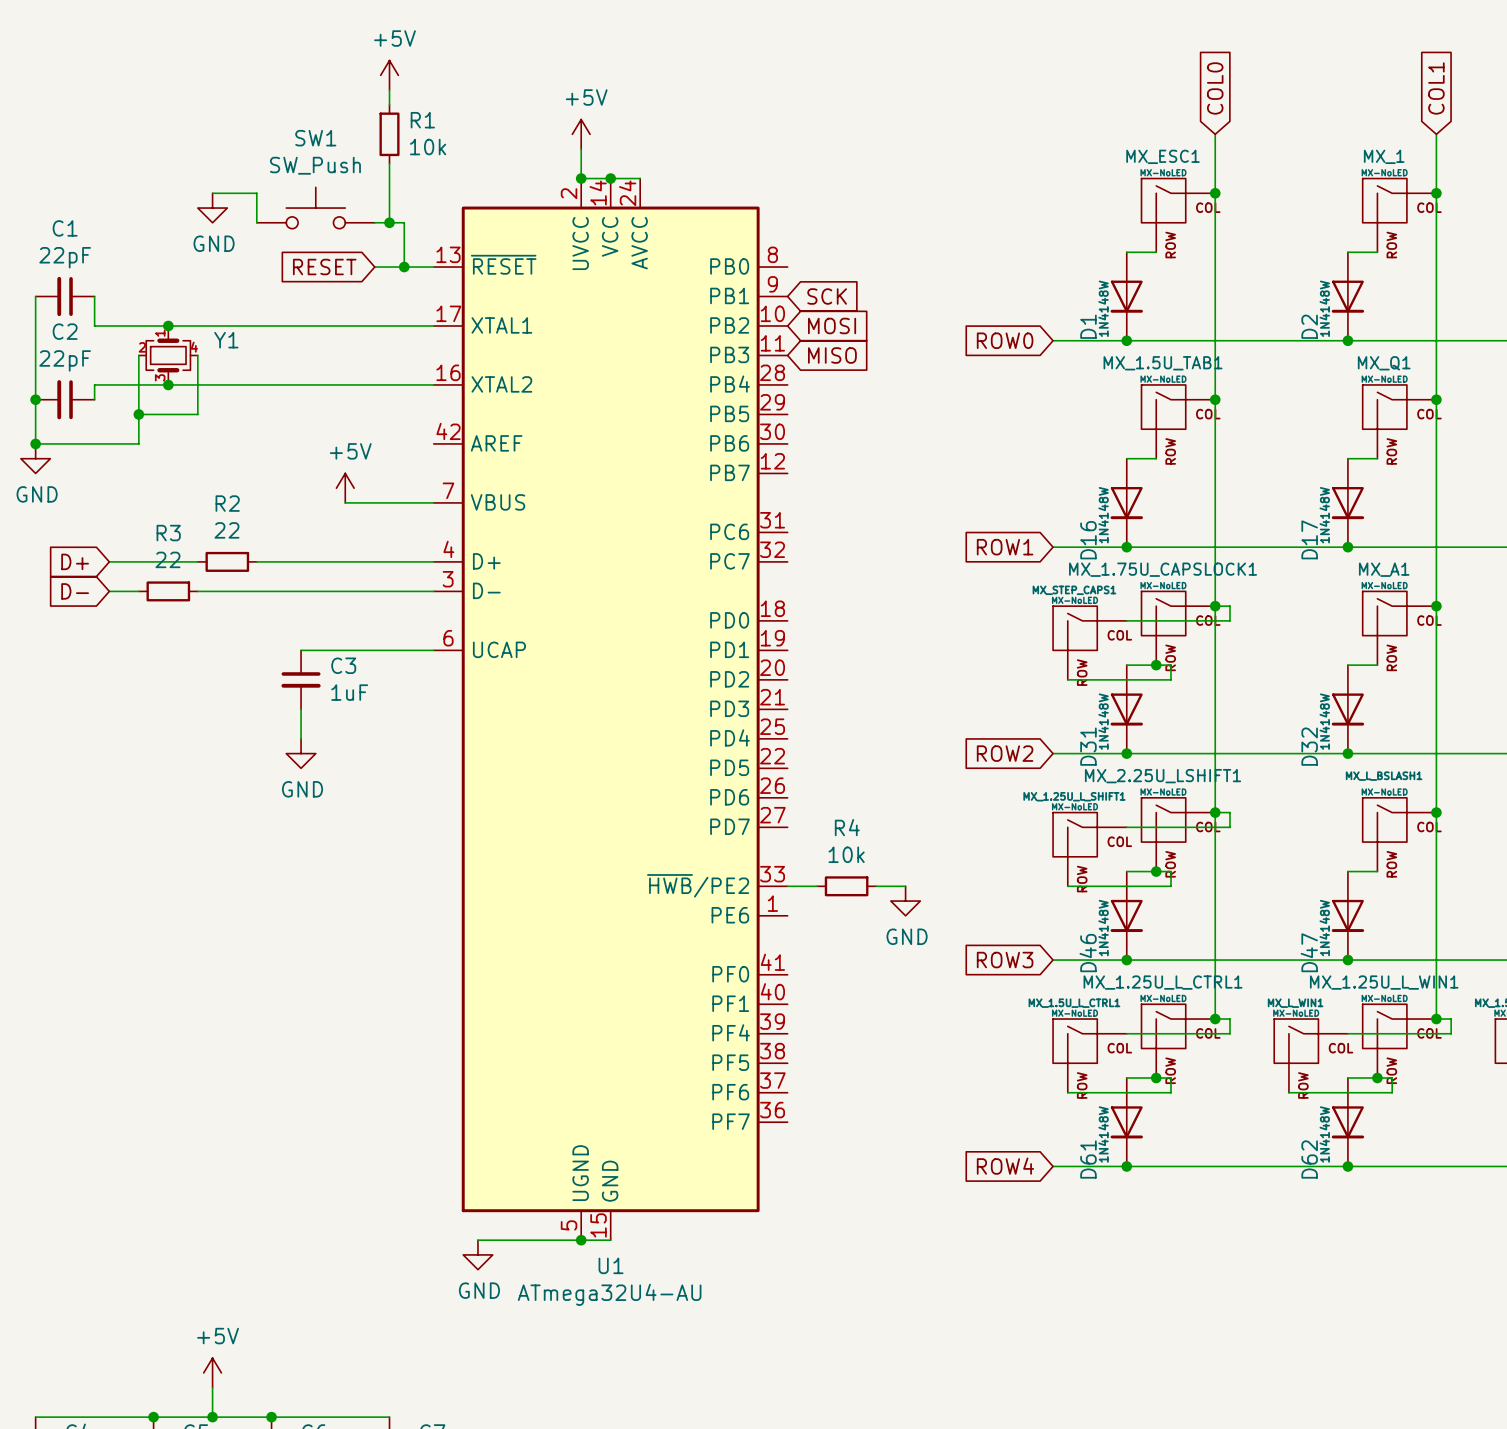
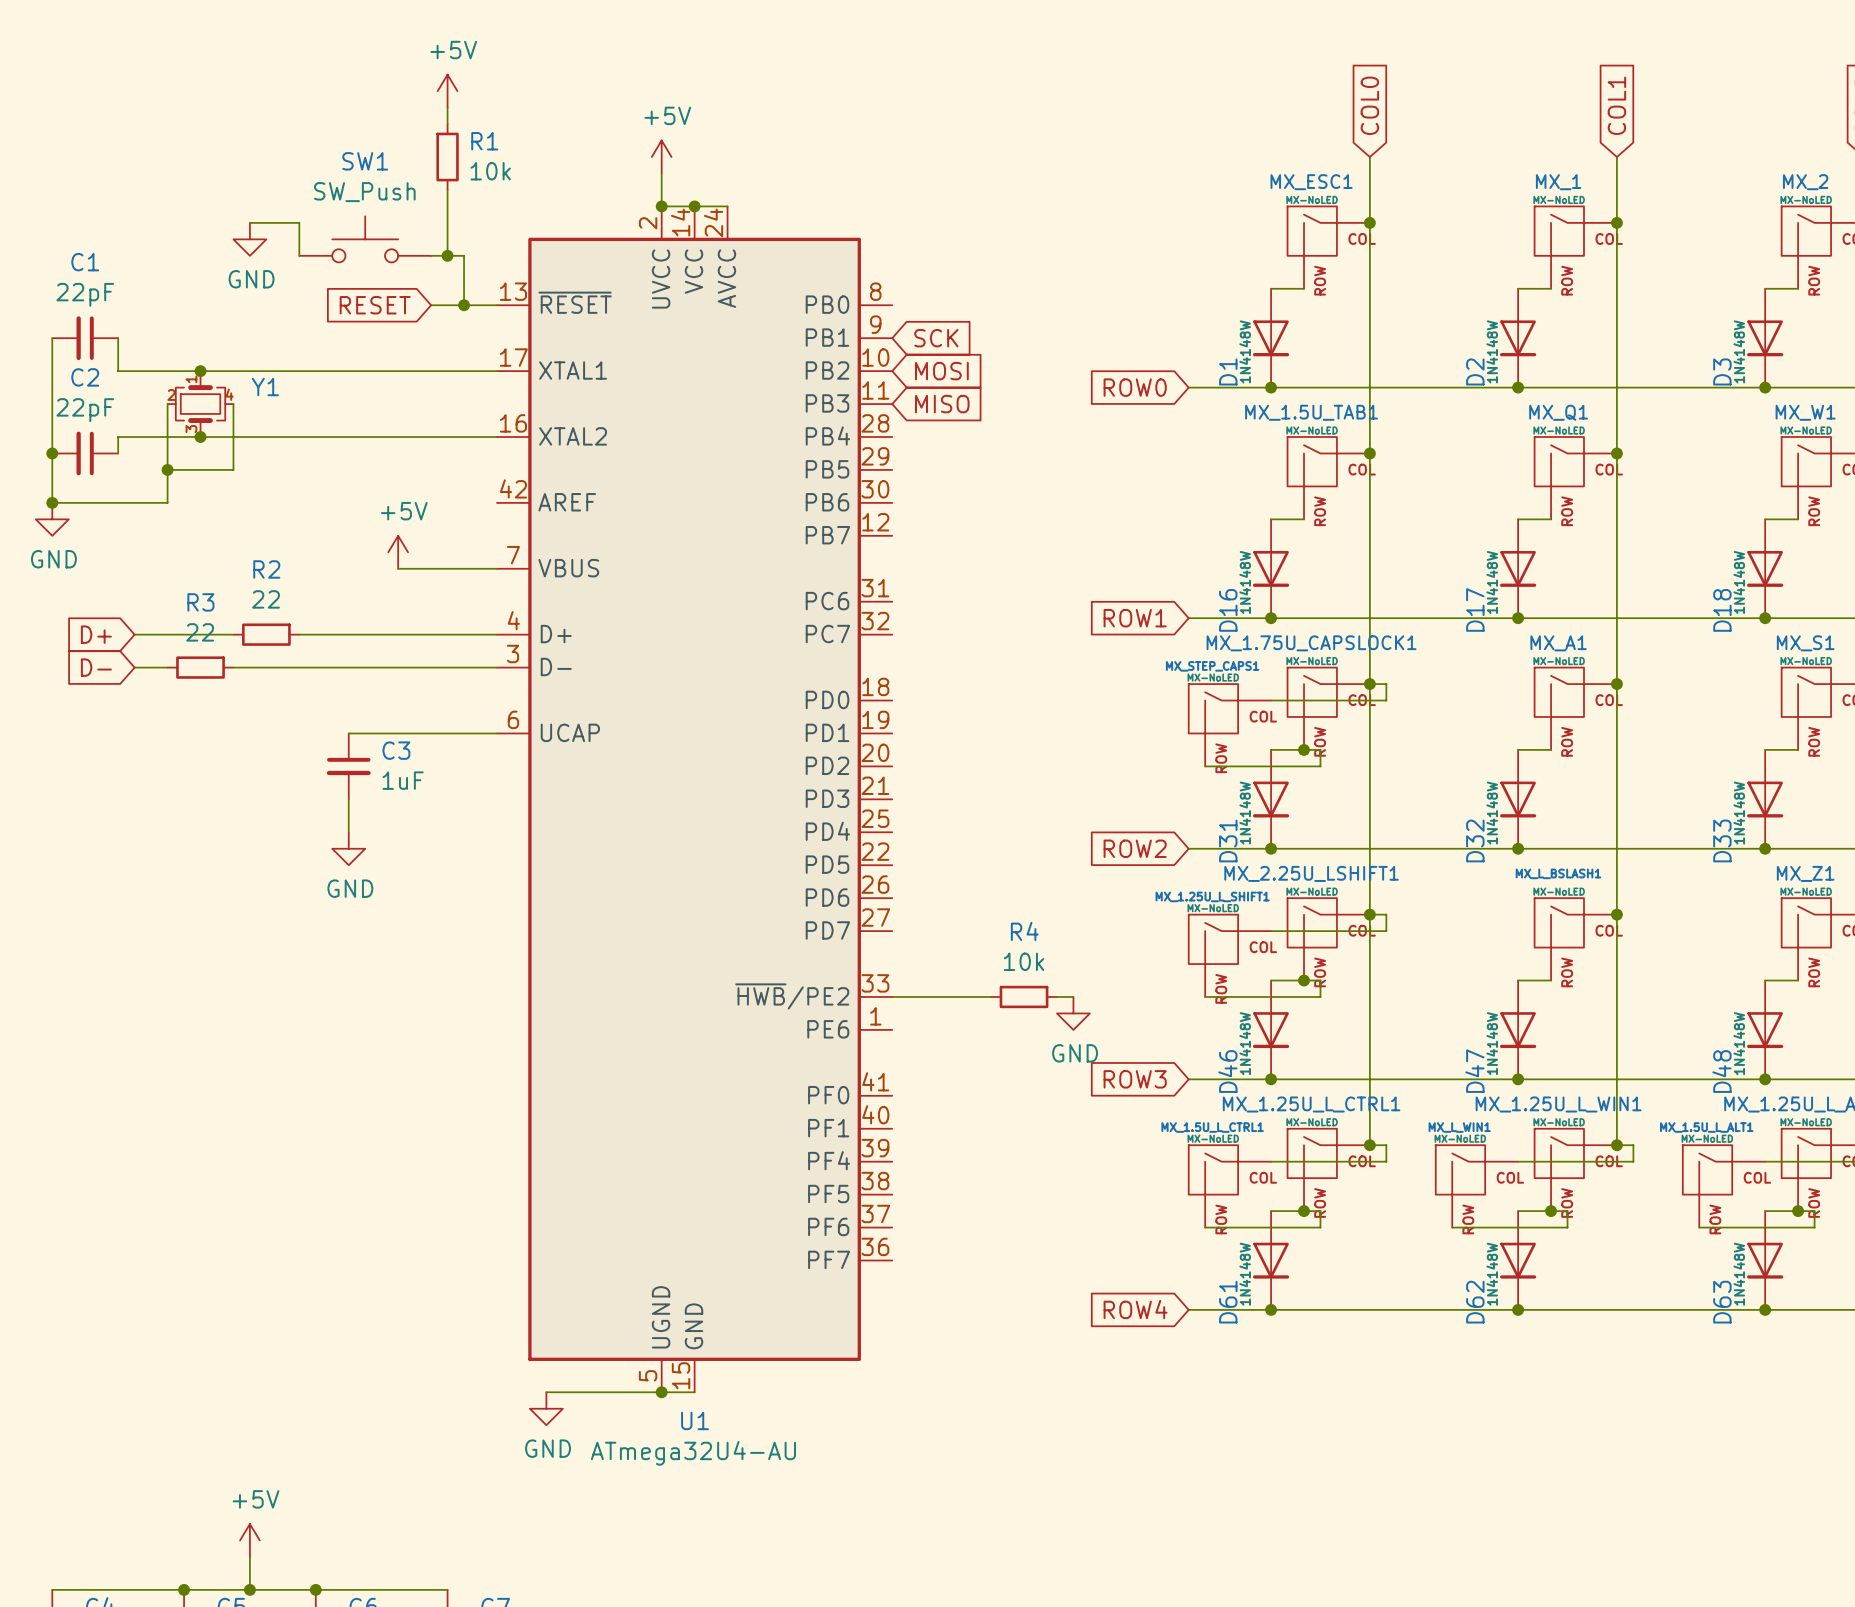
R4 position: (846, 886) -> (1024, 996)
wire: (876, 886) (905, 886) -> (991, 996) (925, 996)
wire: none -> (1056, 996) (1073, 996)
power symbol position: GND (905, 901) -> GND (1073, 1013)

